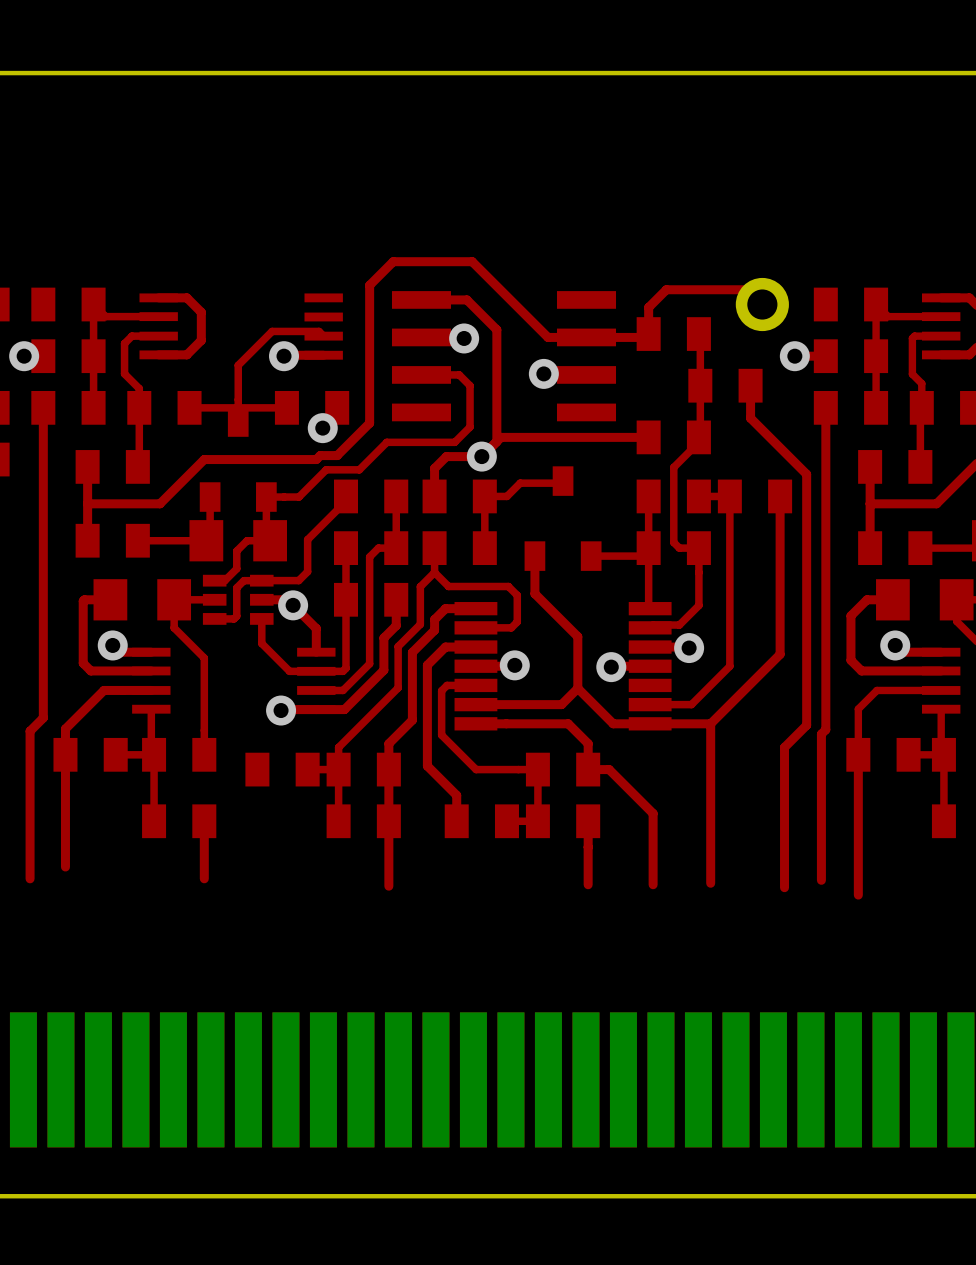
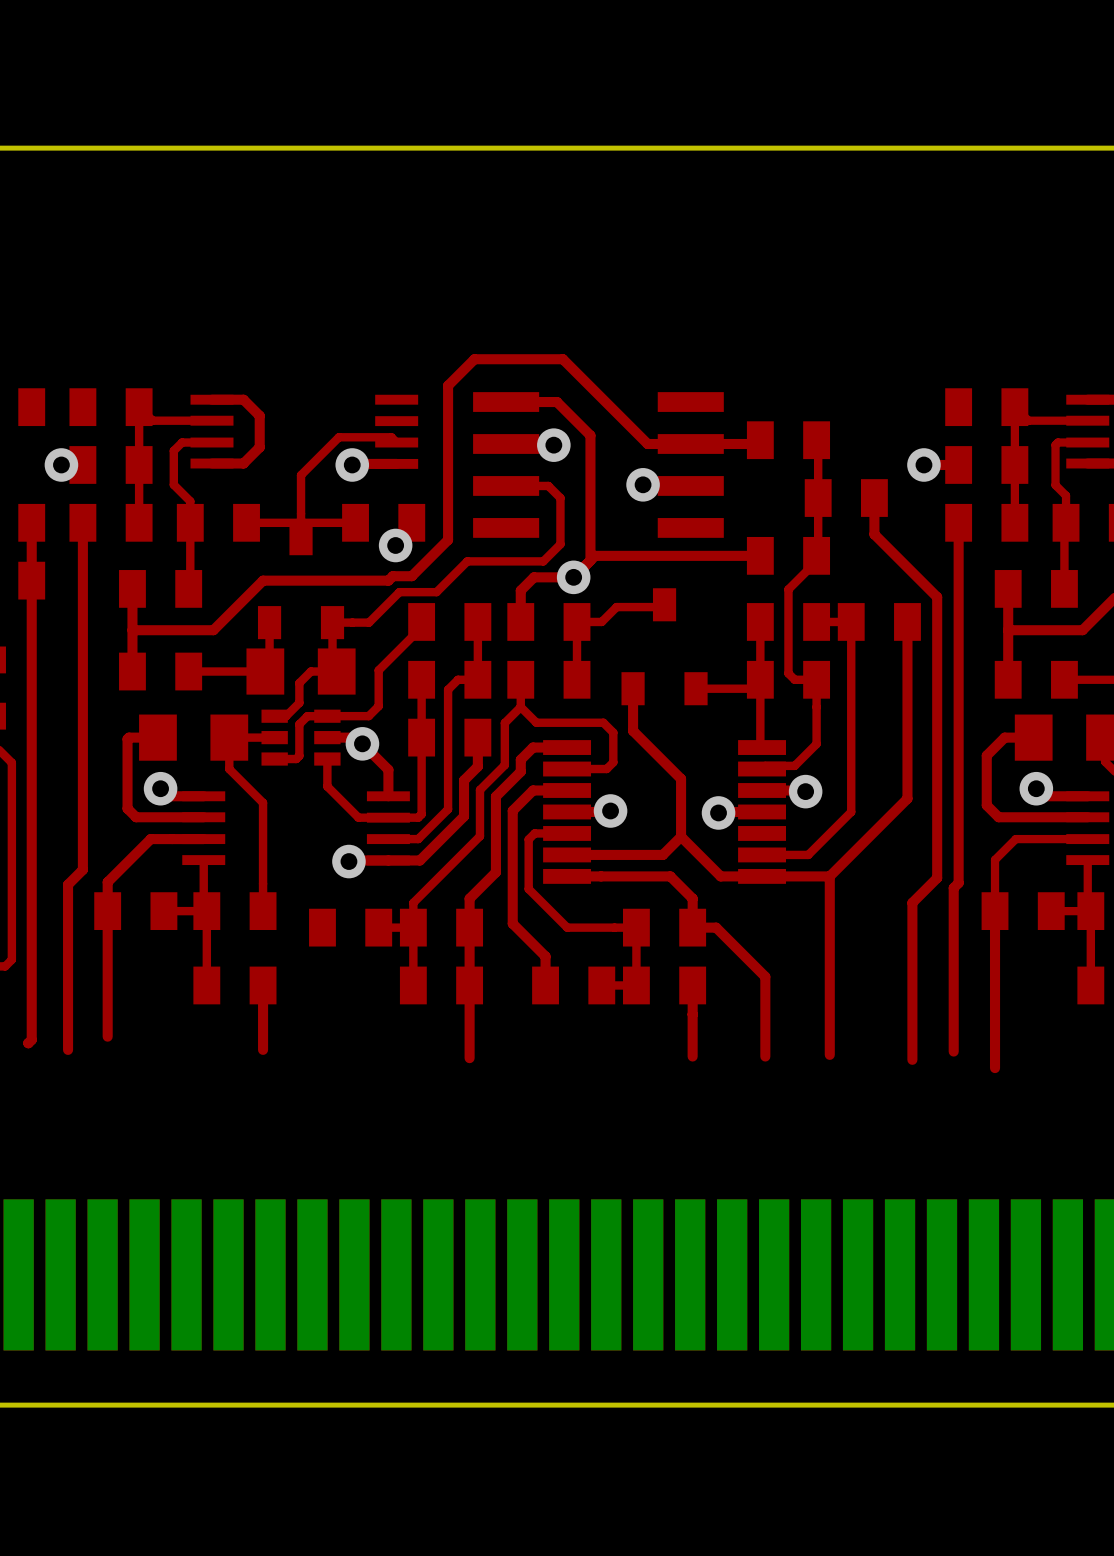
top track: (762, 304) (747, 289) (666, 289) (648, 307) (648, 334) -> none
part: (762, 304) -> none

